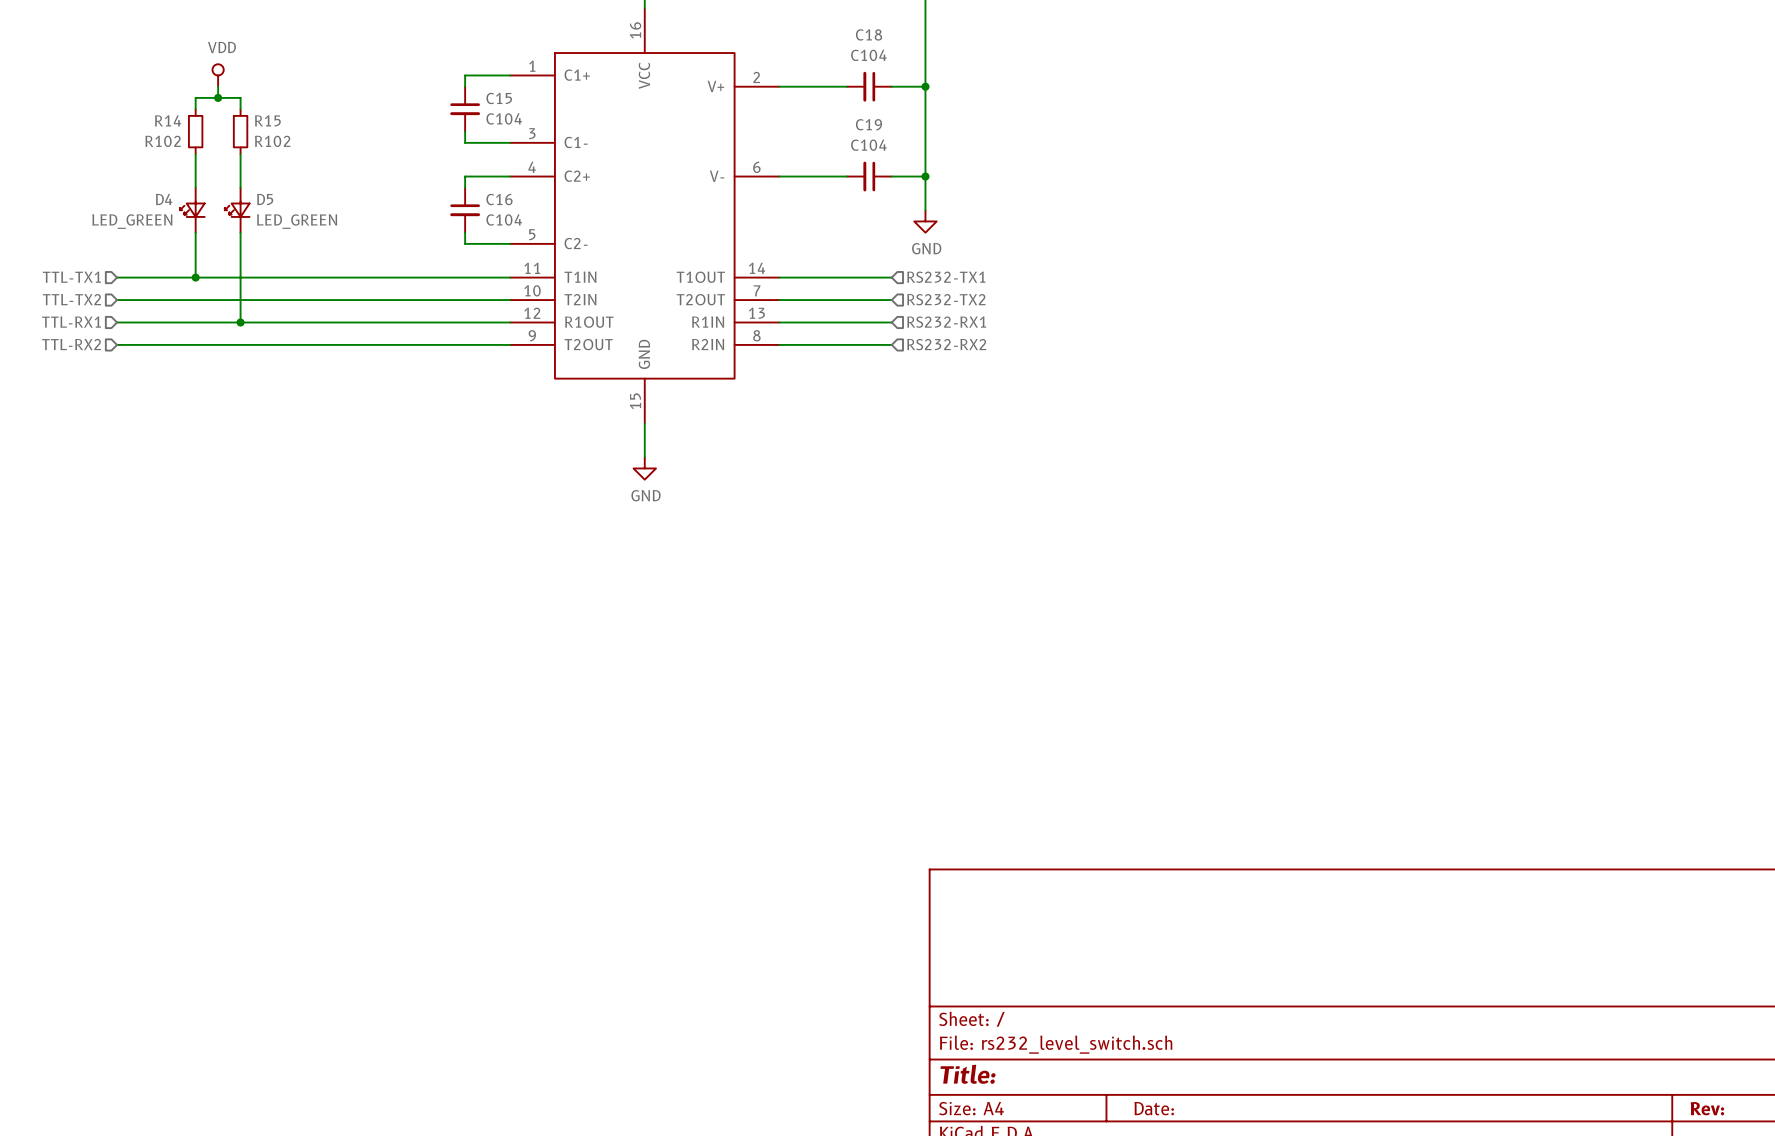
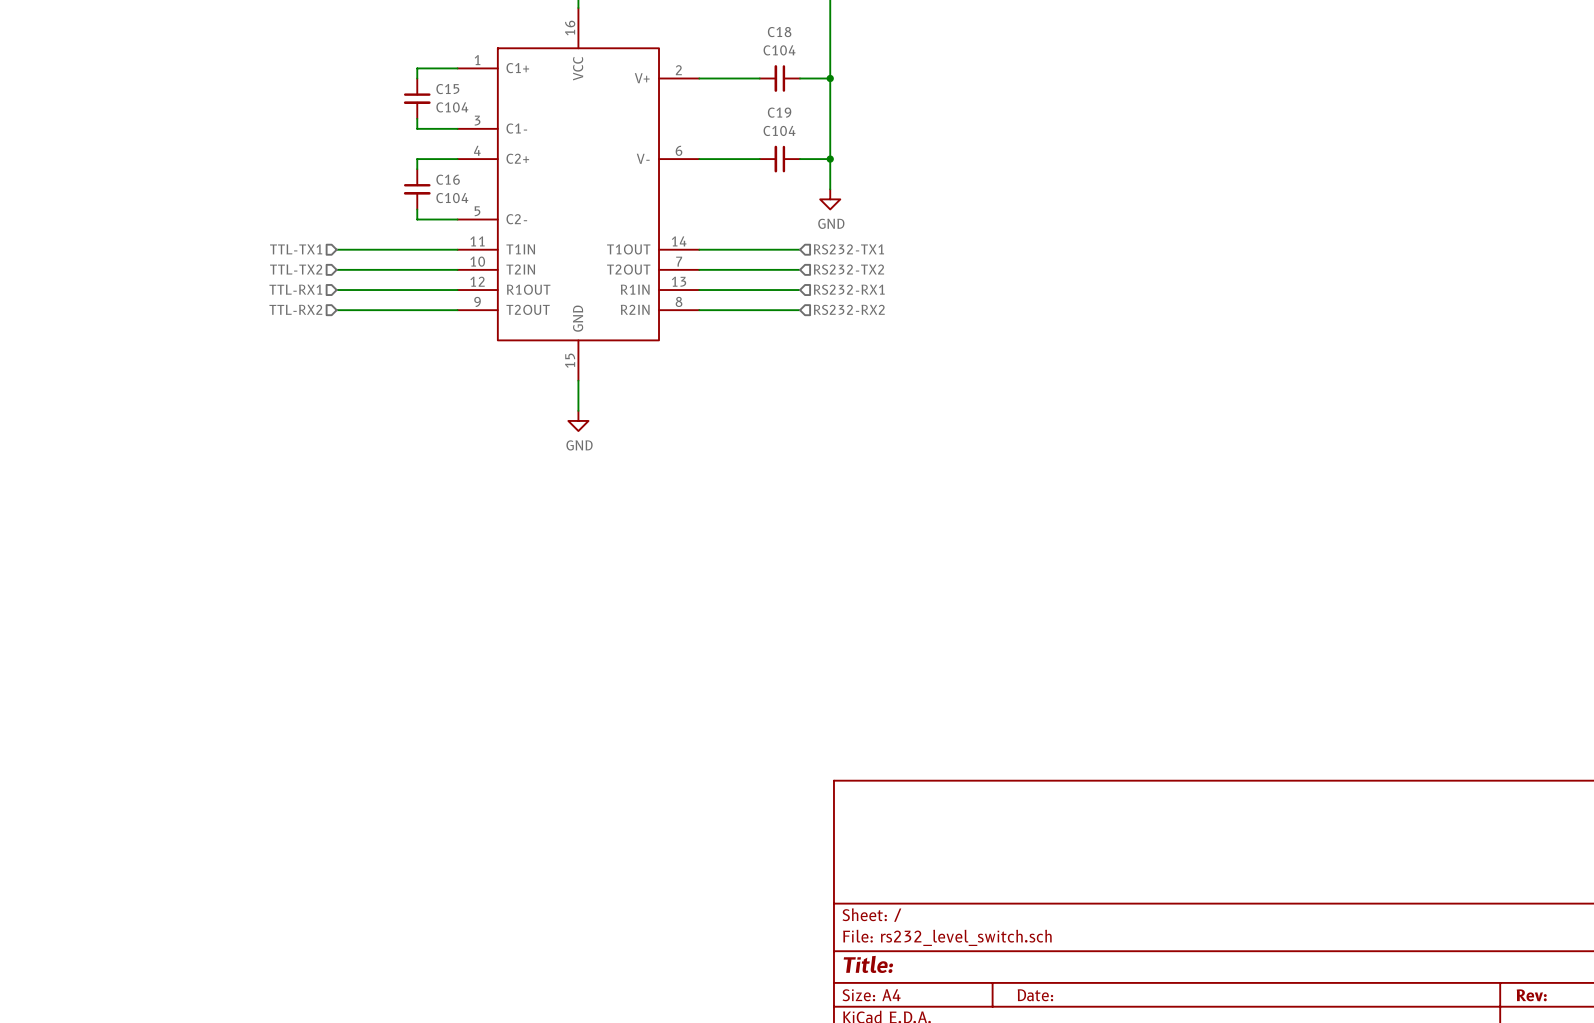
power symbol: VDD (218, 75) -> none
wire: (218, 86) (218, 97) -> none
junction: (218, 97) -> none
wire: (195, 109) (195, 97) (240, 97) (240, 109) -> none
R14: R102 (195, 131) -> none
R15: R102 (240, 131) -> none
wire: (195, 154) (195, 187) -> none
wire: (240, 154) (240, 187) -> none
D4: LED_GREEN (192, 210) -> none
D5: LED_GREEN (237, 210) -> none
wire: (195, 232) (195, 277) -> none
wire: (240, 232) (240, 322) -> none
hierarchical label: TTL-TX1 (71, 277) -> none
wire: (117, 277) (375, 277) -> none
junction: (195, 277) -> none
hierarchical label: none -> TTL-TX1 (296, 249)
hierarchical label: TTL-TX2 (71, 299) -> none
hierarchical label: none -> TTL-TX2 (296, 269)
wire: (117, 300) (375, 300) -> none
hierarchical label: TTL-RX1 (71, 322) -> none
wire: (117, 322) (375, 322) -> none
junction: (240, 322) -> none
hierarchical label: none -> TTL-RX1 (295, 289)
hierarchical label: TTL-RX2 (71, 344) -> none
wire: (117, 344) (375, 344) -> none
hierarchical label: none -> TTL-RX2 (295, 309)

